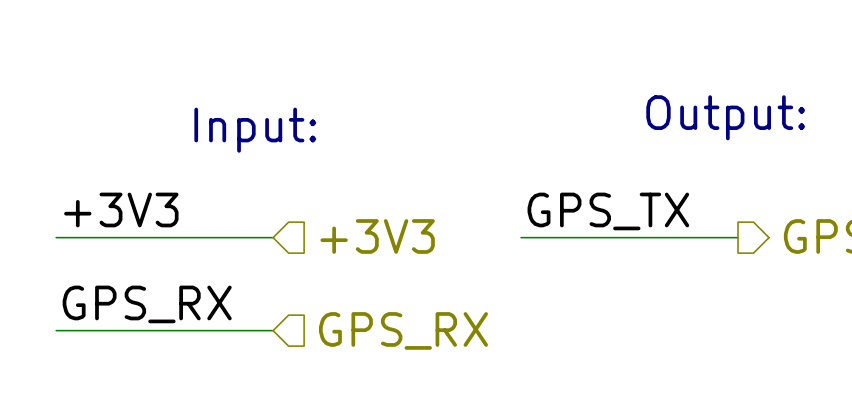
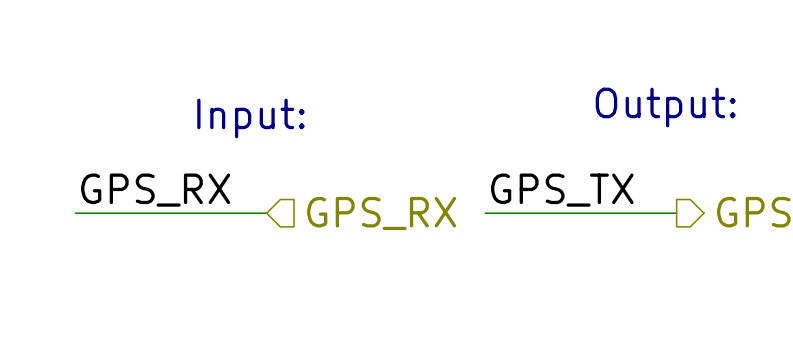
label: +3V3 (121, 209) -> GPS_RX (155, 190)
hierarchical label: +3V3 (377, 236) -> GPS_RX (381, 213)
label: GPS_RX (147, 304) -> none
wire: (56, 330) (273, 330) -> none
hierarchical label: GPS_RX (403, 330) -> none

